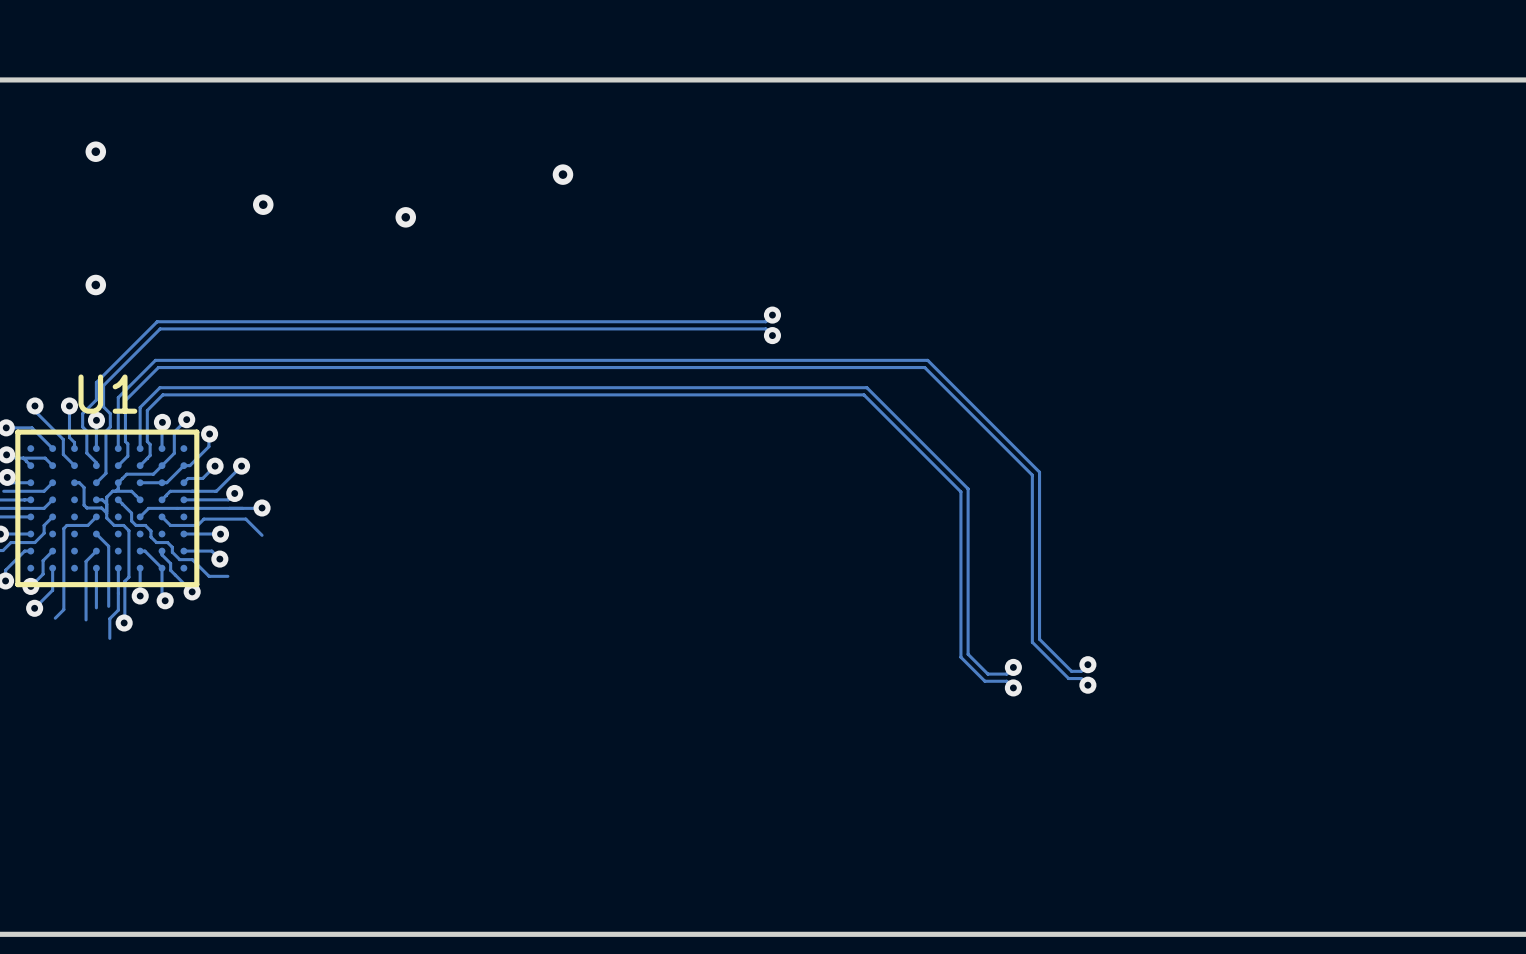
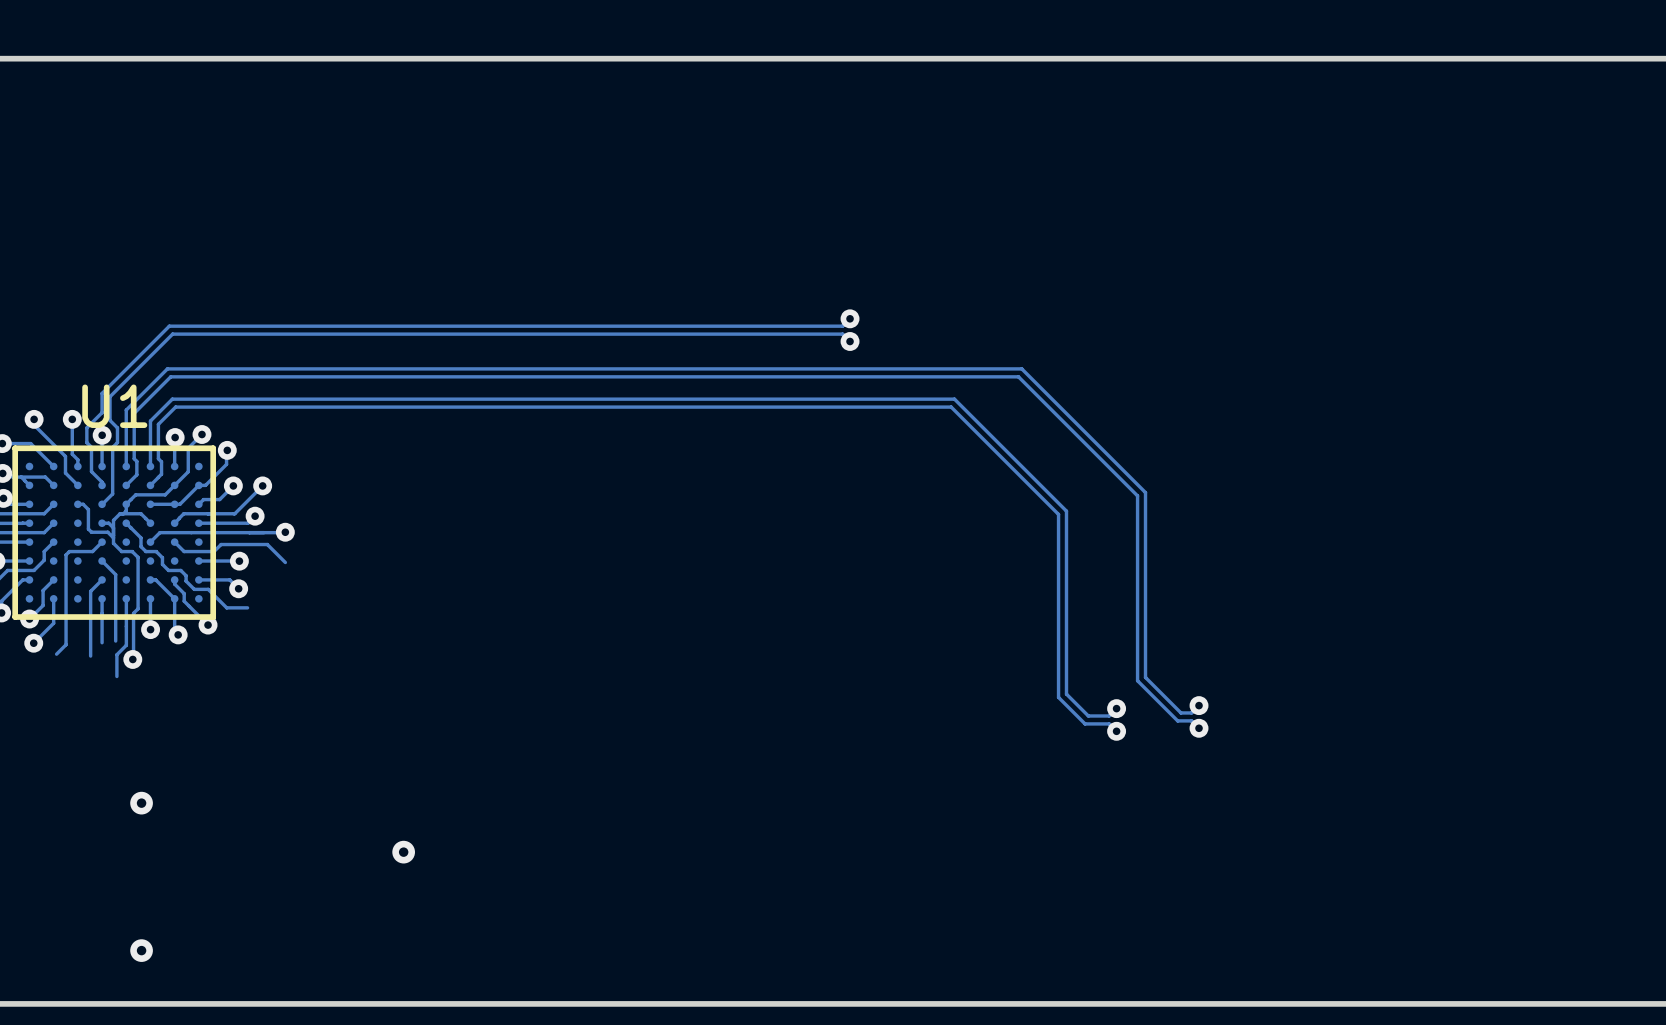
via: (95, 151) -> none
via: (562, 174) -> none
via: (263, 204) -> none
via: (405, 217) -> none
via: (95, 285) -> none
via: none -> (141, 803)
via: none -> (403, 852)
via: none -> (141, 950)

